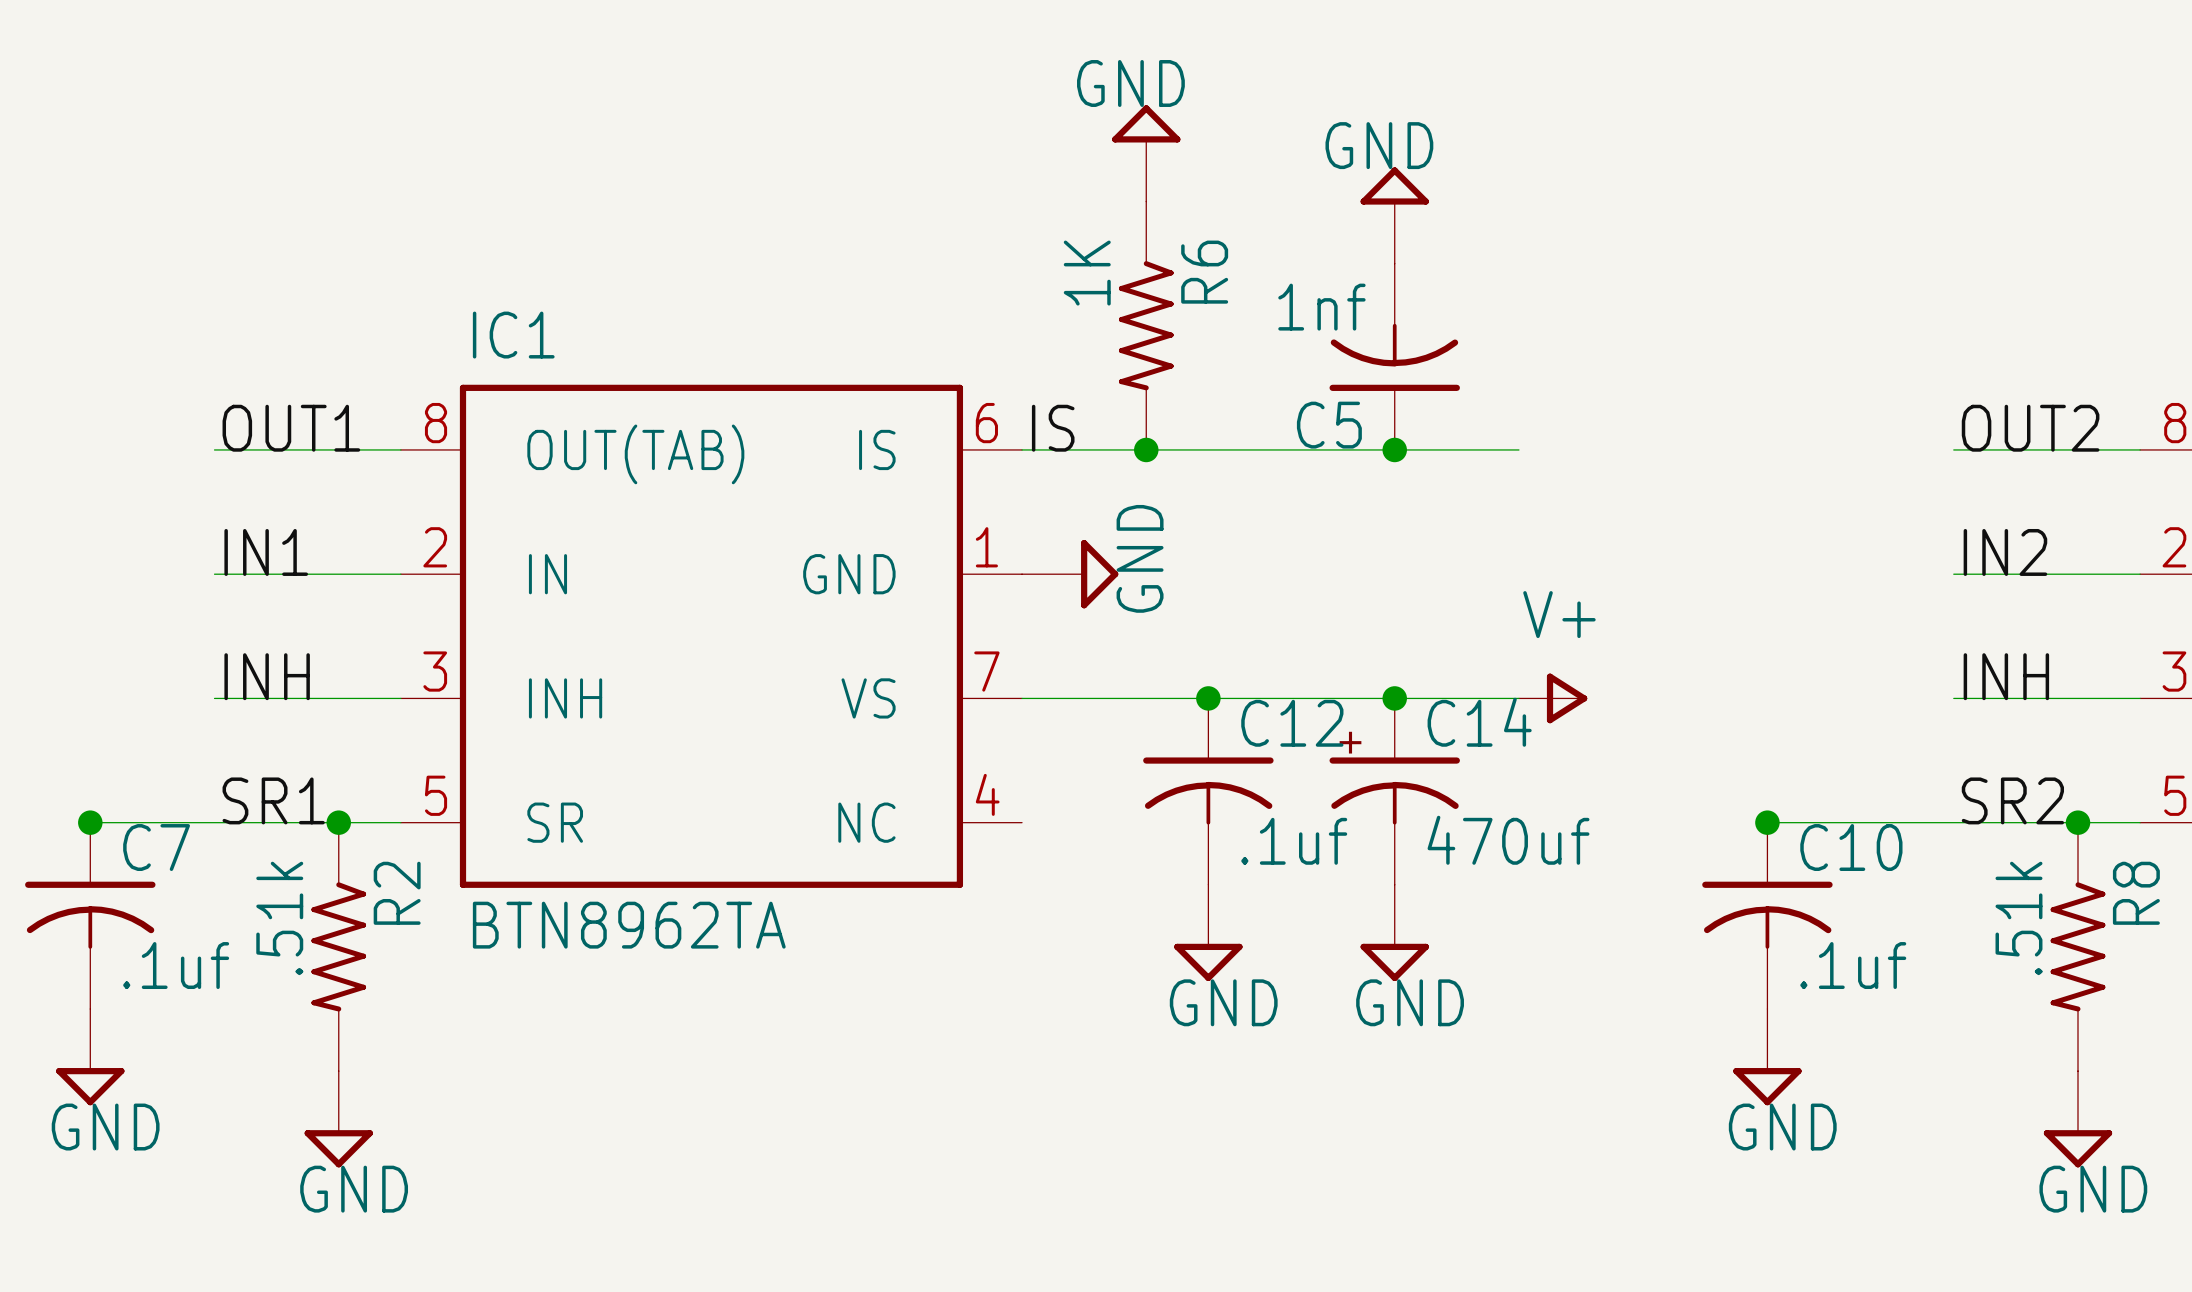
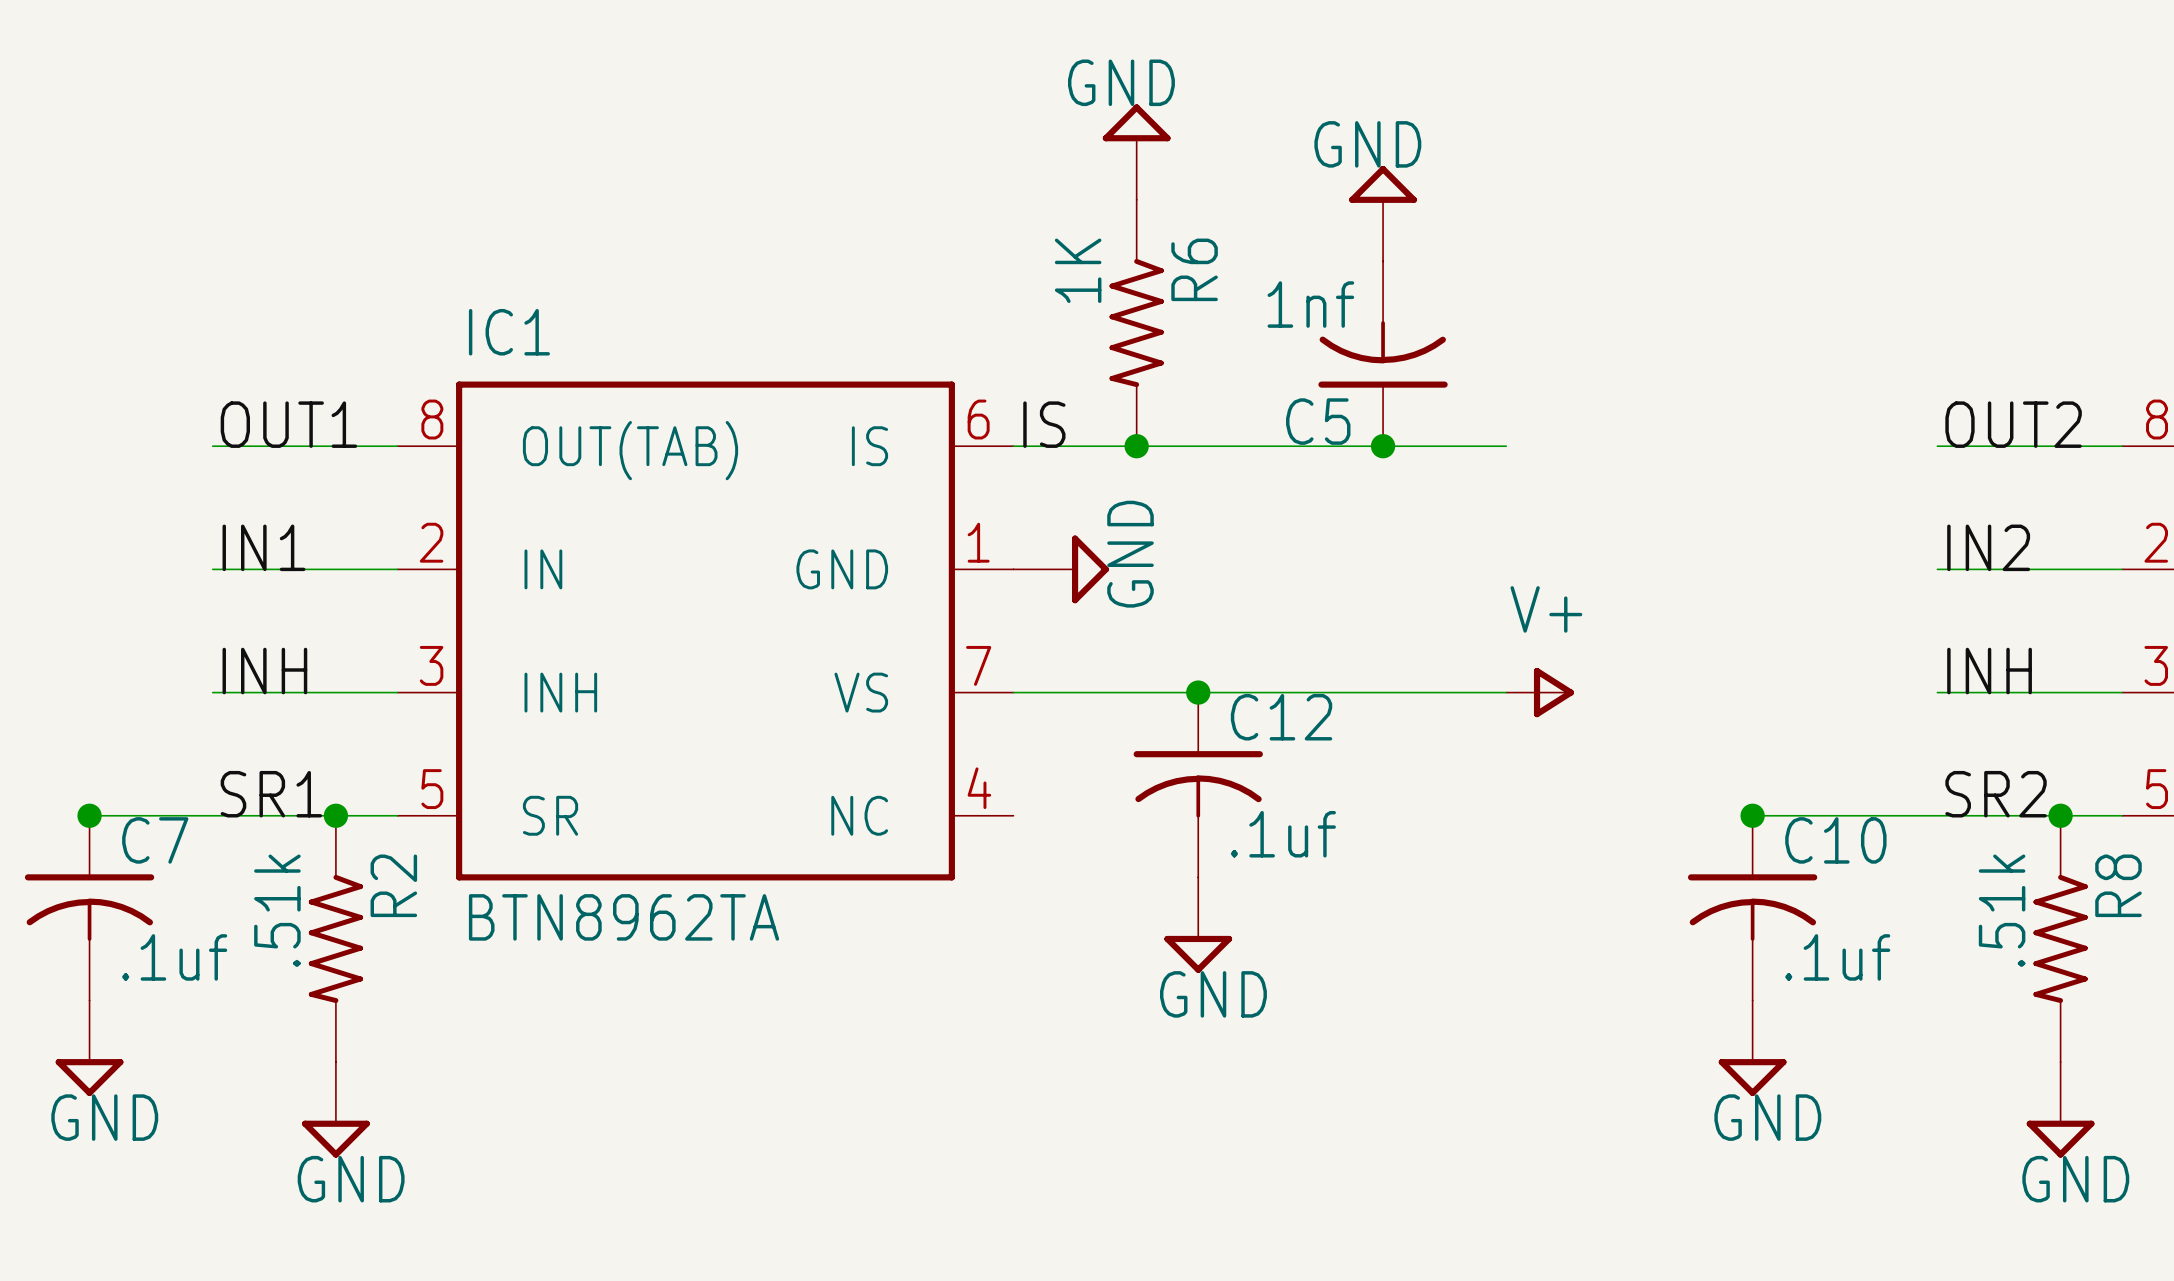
junction: (1394, 698) -> none
C14: 470uf (1394, 791) -> none
power symbol: GND (1394, 932) -> none

